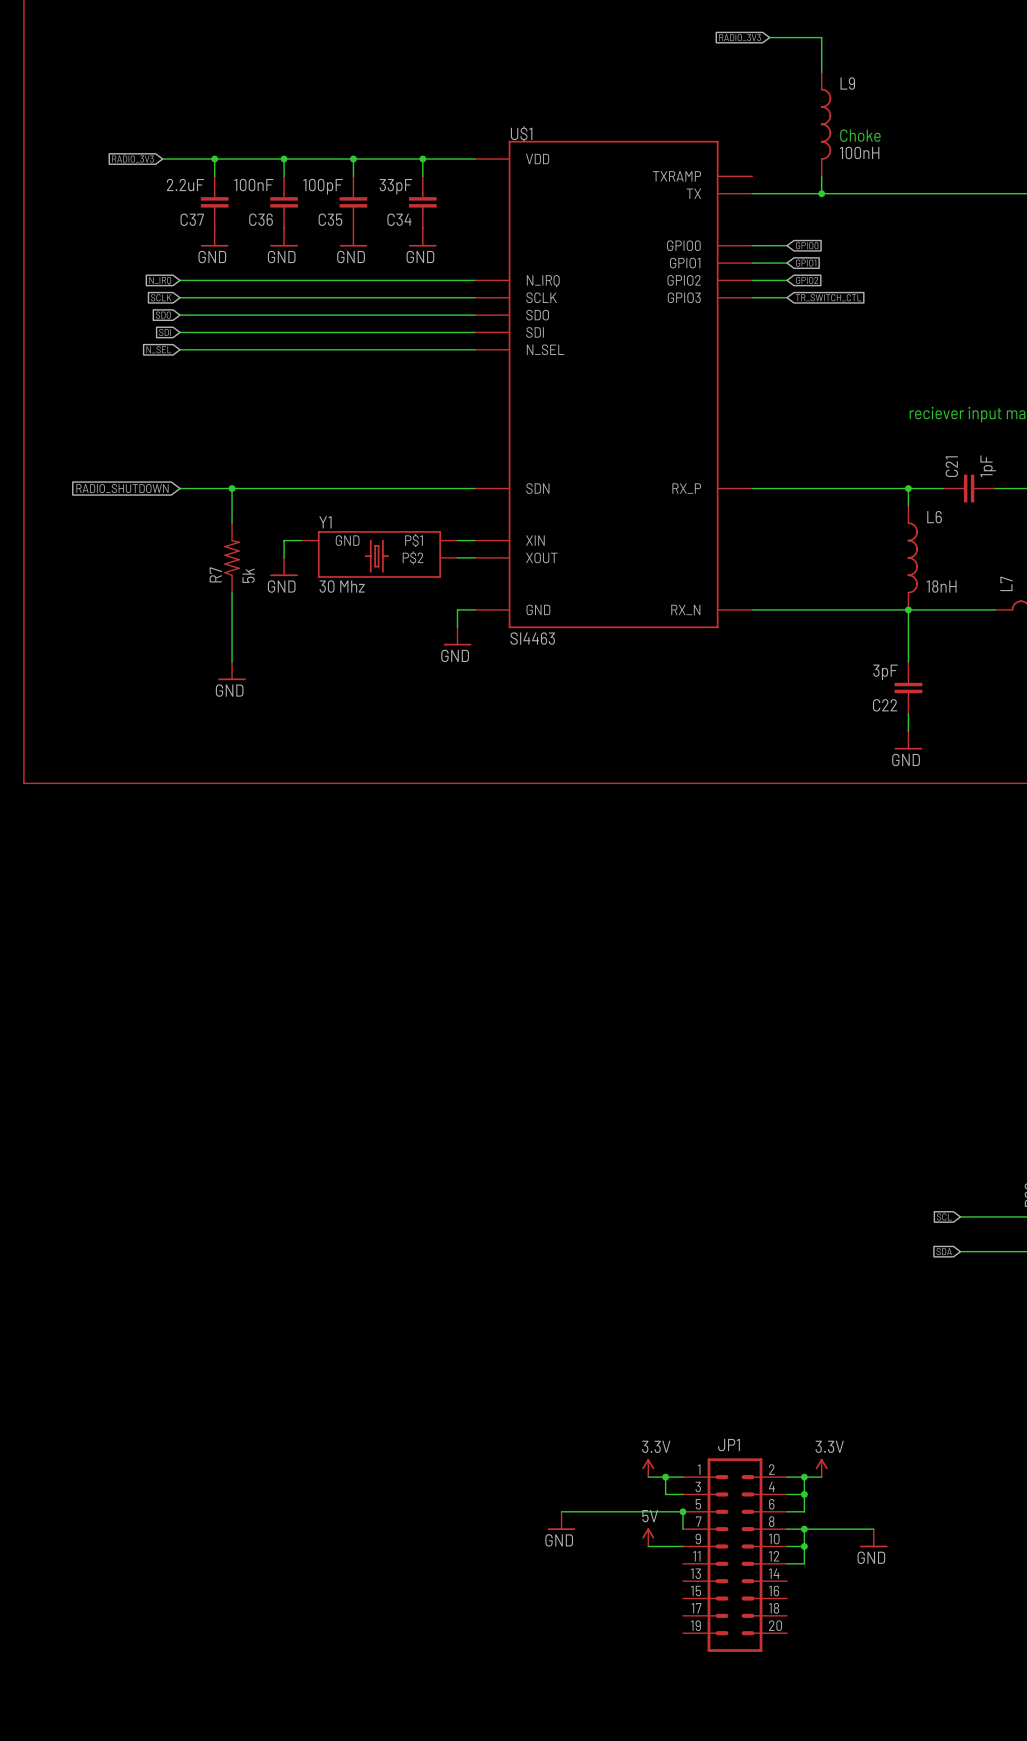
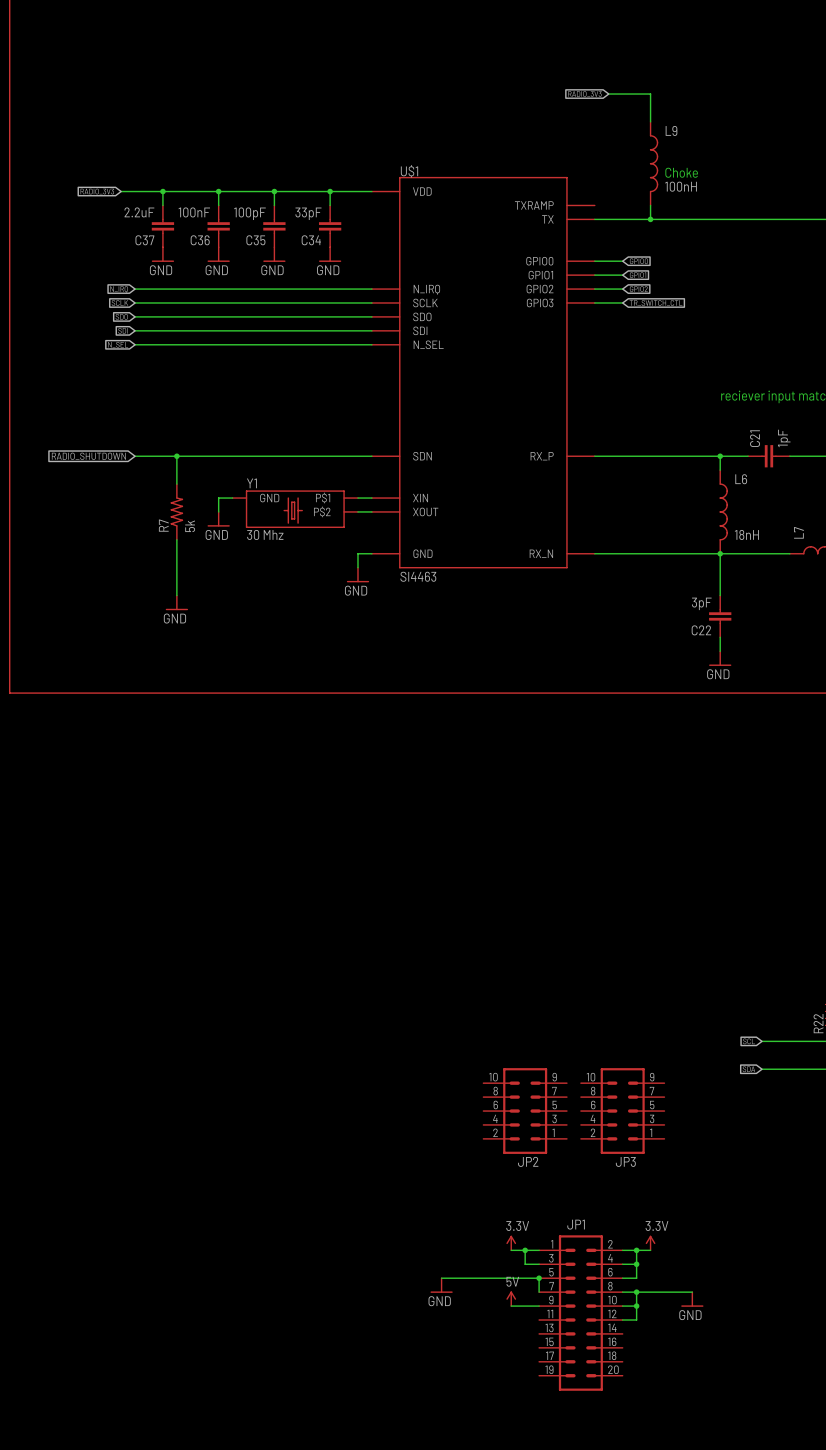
JP2: none -> (525, 1111)
JP3: none -> (622, 1111)

